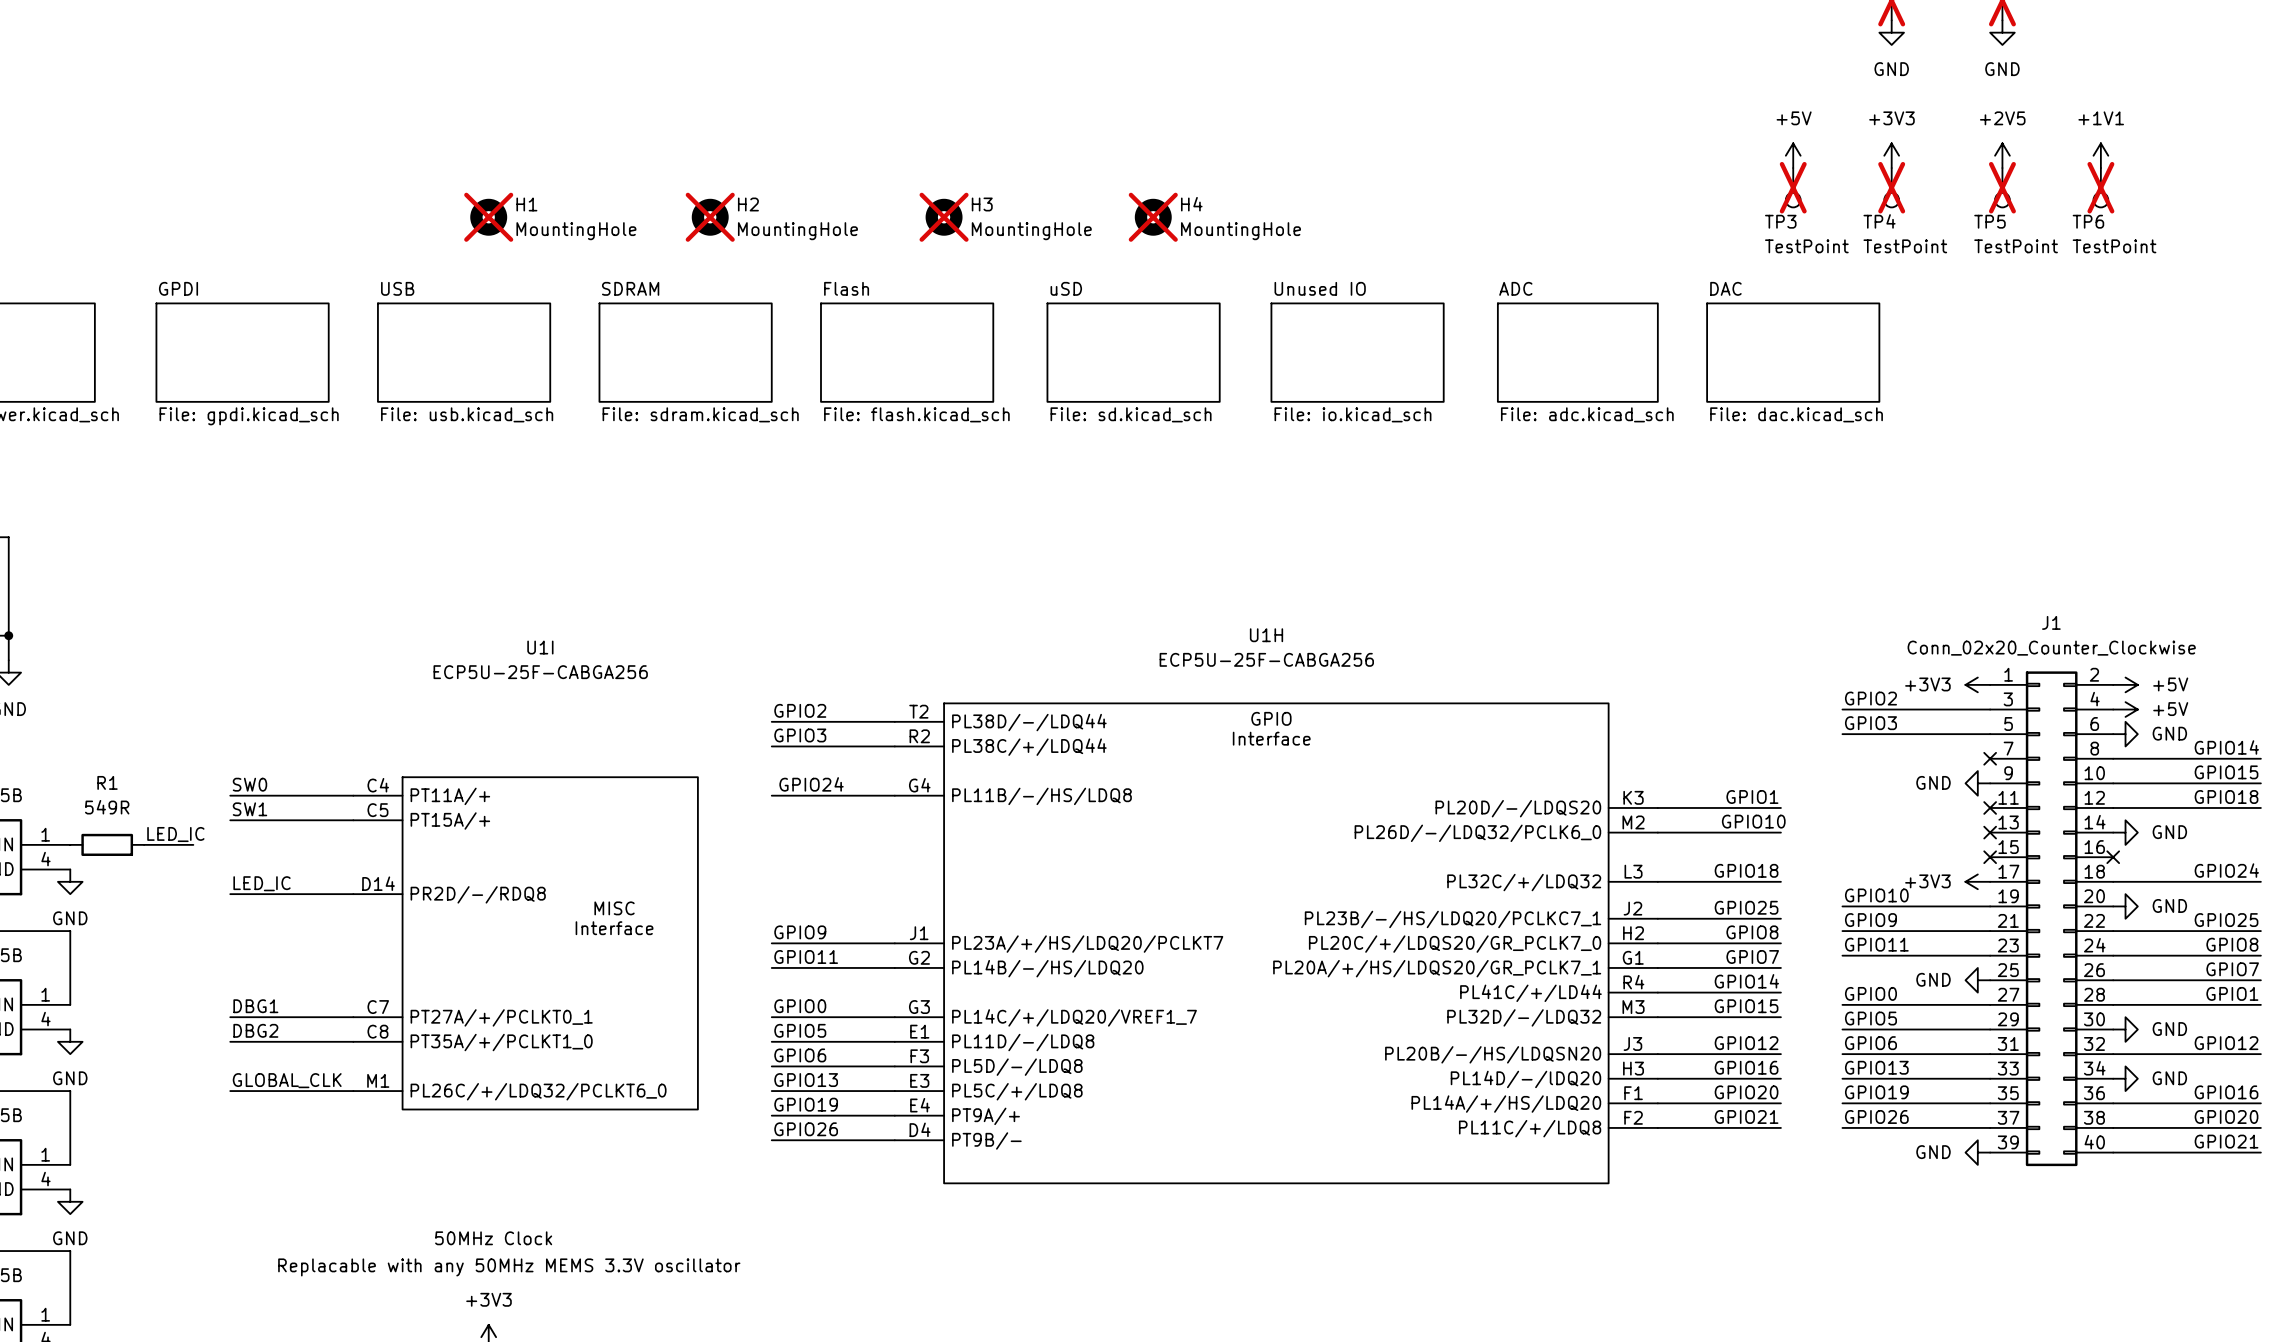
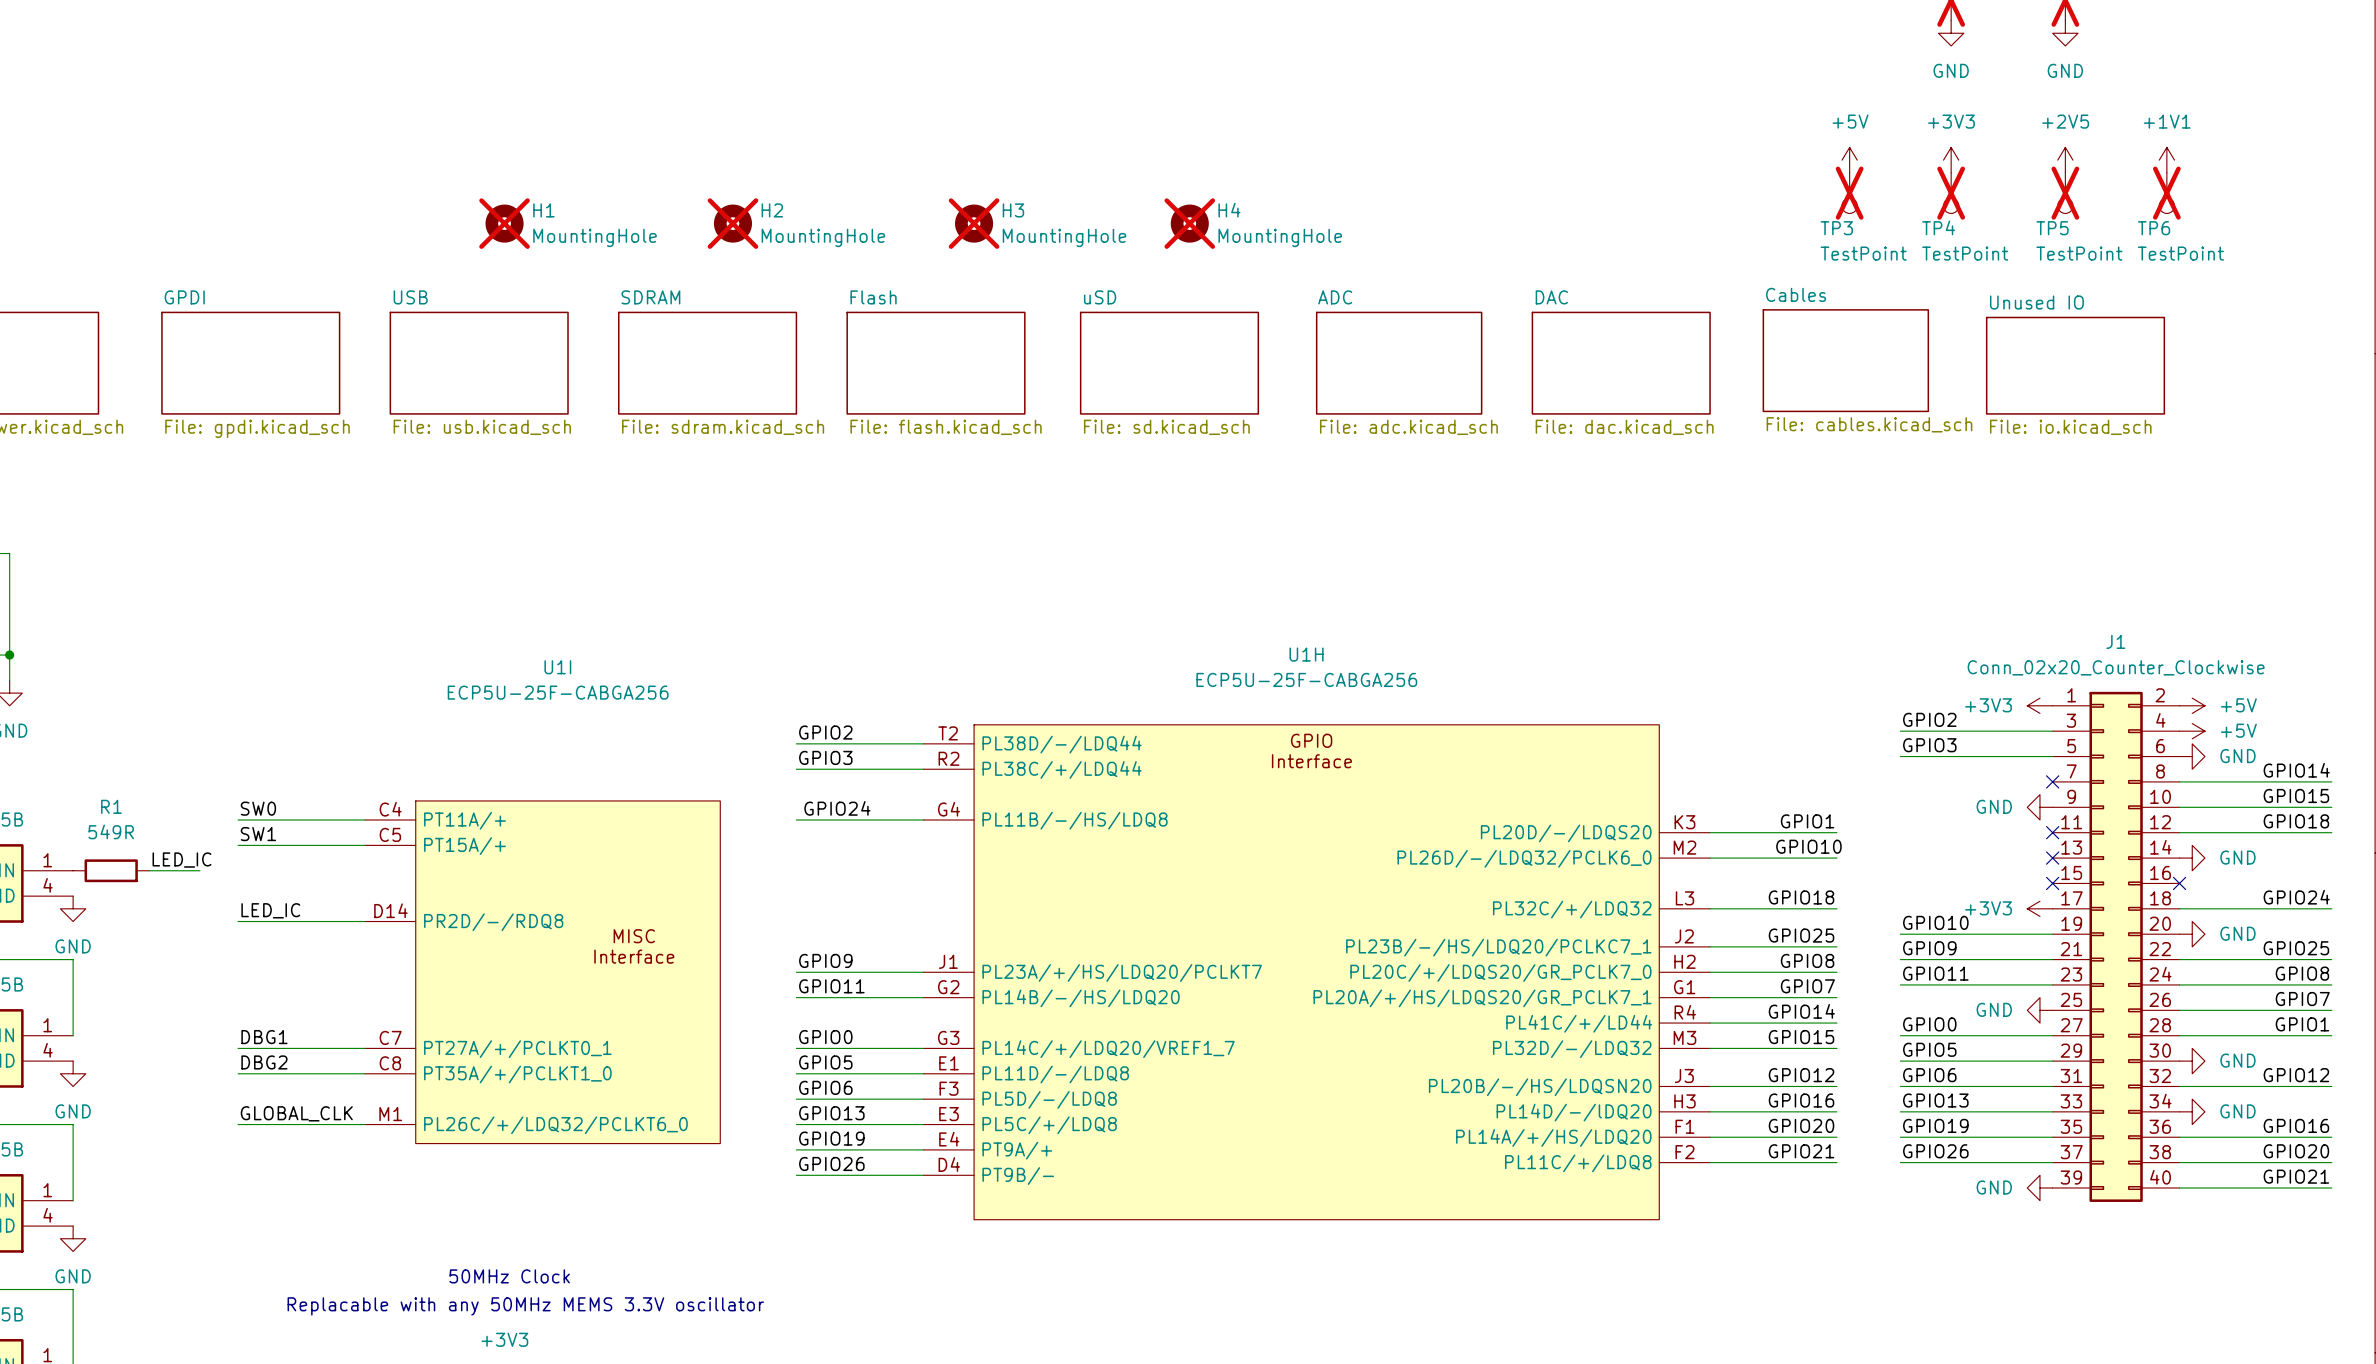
sheet Cables: none -> File: cables.kicad_sch (1845, 360)
sheet Unused IO: File: io.kicad_sch (1357, 352) -> none
sheet ADC position: (1577, 352) -> (1399, 363)
sheet DAC position: (1793, 352) -> (1621, 363)
sheet Unused IO: none -> File: io.kicad_sch (2075, 365)

